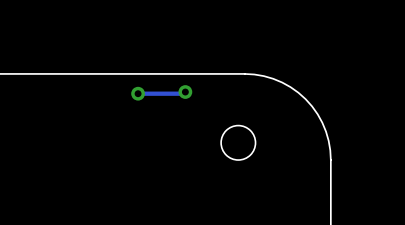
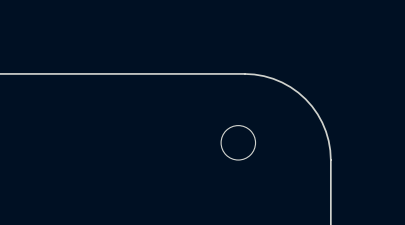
track: (185, 92) (183, 93) (138, 93) -> none
via: (185, 92) -> none
via: (138, 93) -> none

